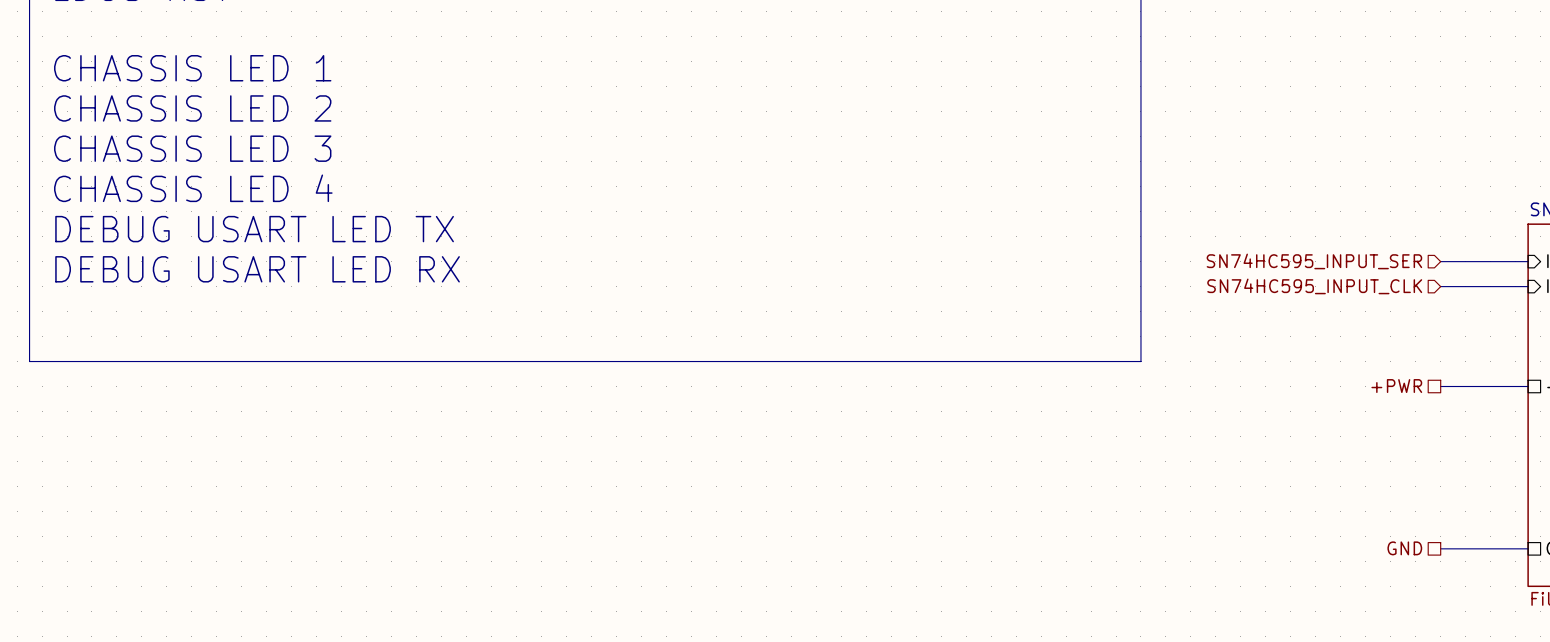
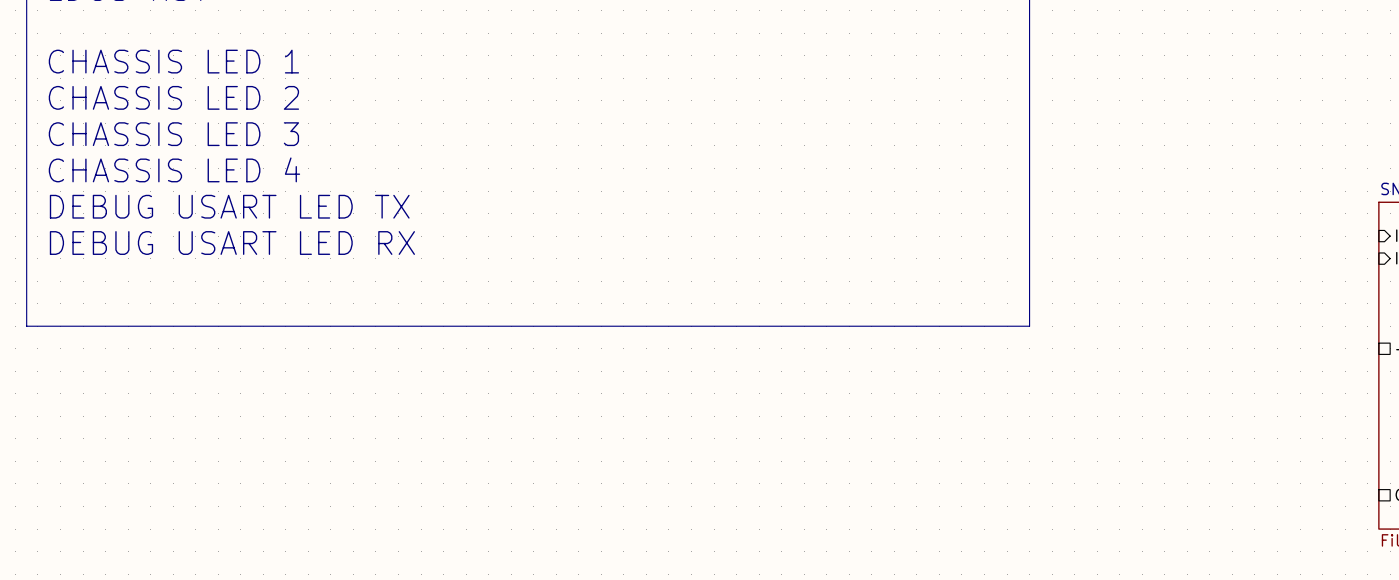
hierarchical label: SN74HC595_INPUT_SER (1314, 261) -> none
wire: (1440, 261) (1528, 261) -> none
hierarchical label: SN74HC595_INPUT_CLK (1314, 286) -> none
wire: (1440, 286) (1528, 286) -> none
hierarchical label: +PWR (1396, 386) -> none
wire: (1440, 386) (1528, 386) -> none
hierarchical label: GND (1404, 548) -> none
wire: (1440, 548) (1528, 548) -> none

